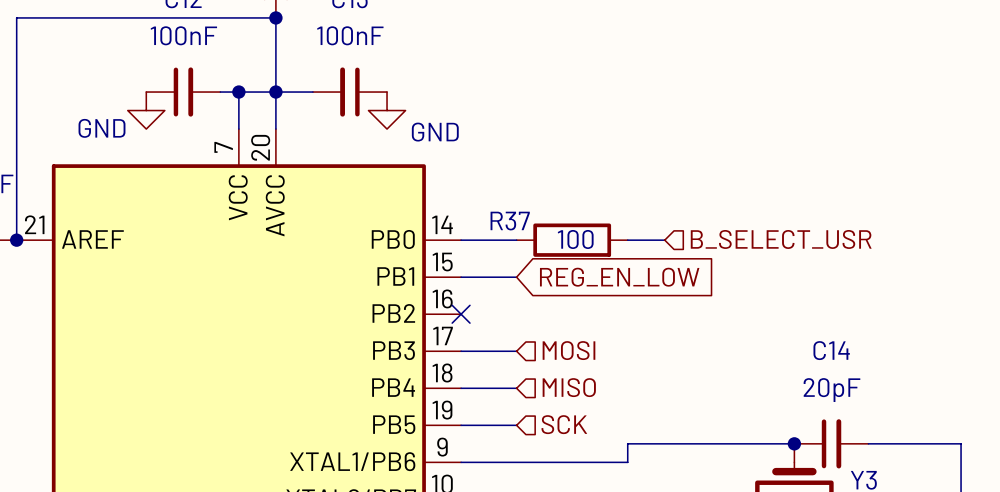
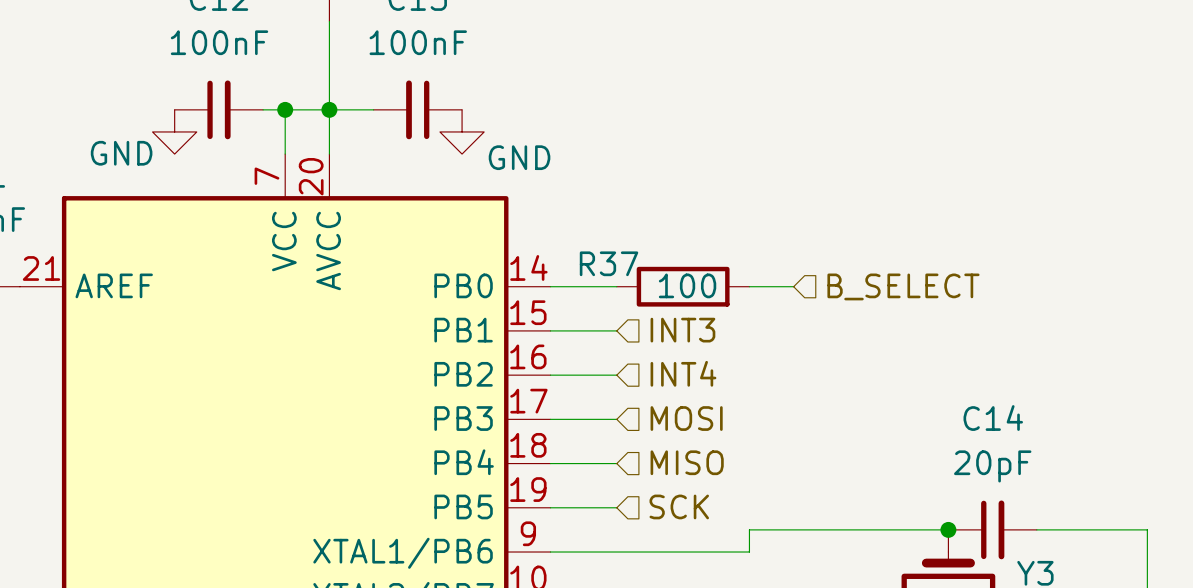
wire: (275, 17) (16, 17) (16, 240) -> none
junction: (275, 17) -> none
hierarchical label: B_SELECT_USR (781, 239) -> B_SELECT (903, 286)
junction: (16, 240) -> none
hierarchical label: none -> INT3 (682, 330)
global label: REG_EN_LOW (619, 277) -> none
hierarchical label: none -> INT4 (683, 373)
wire: none -> (550, 375) (616, 375)
no-connect mark: (461, 314) -> none

